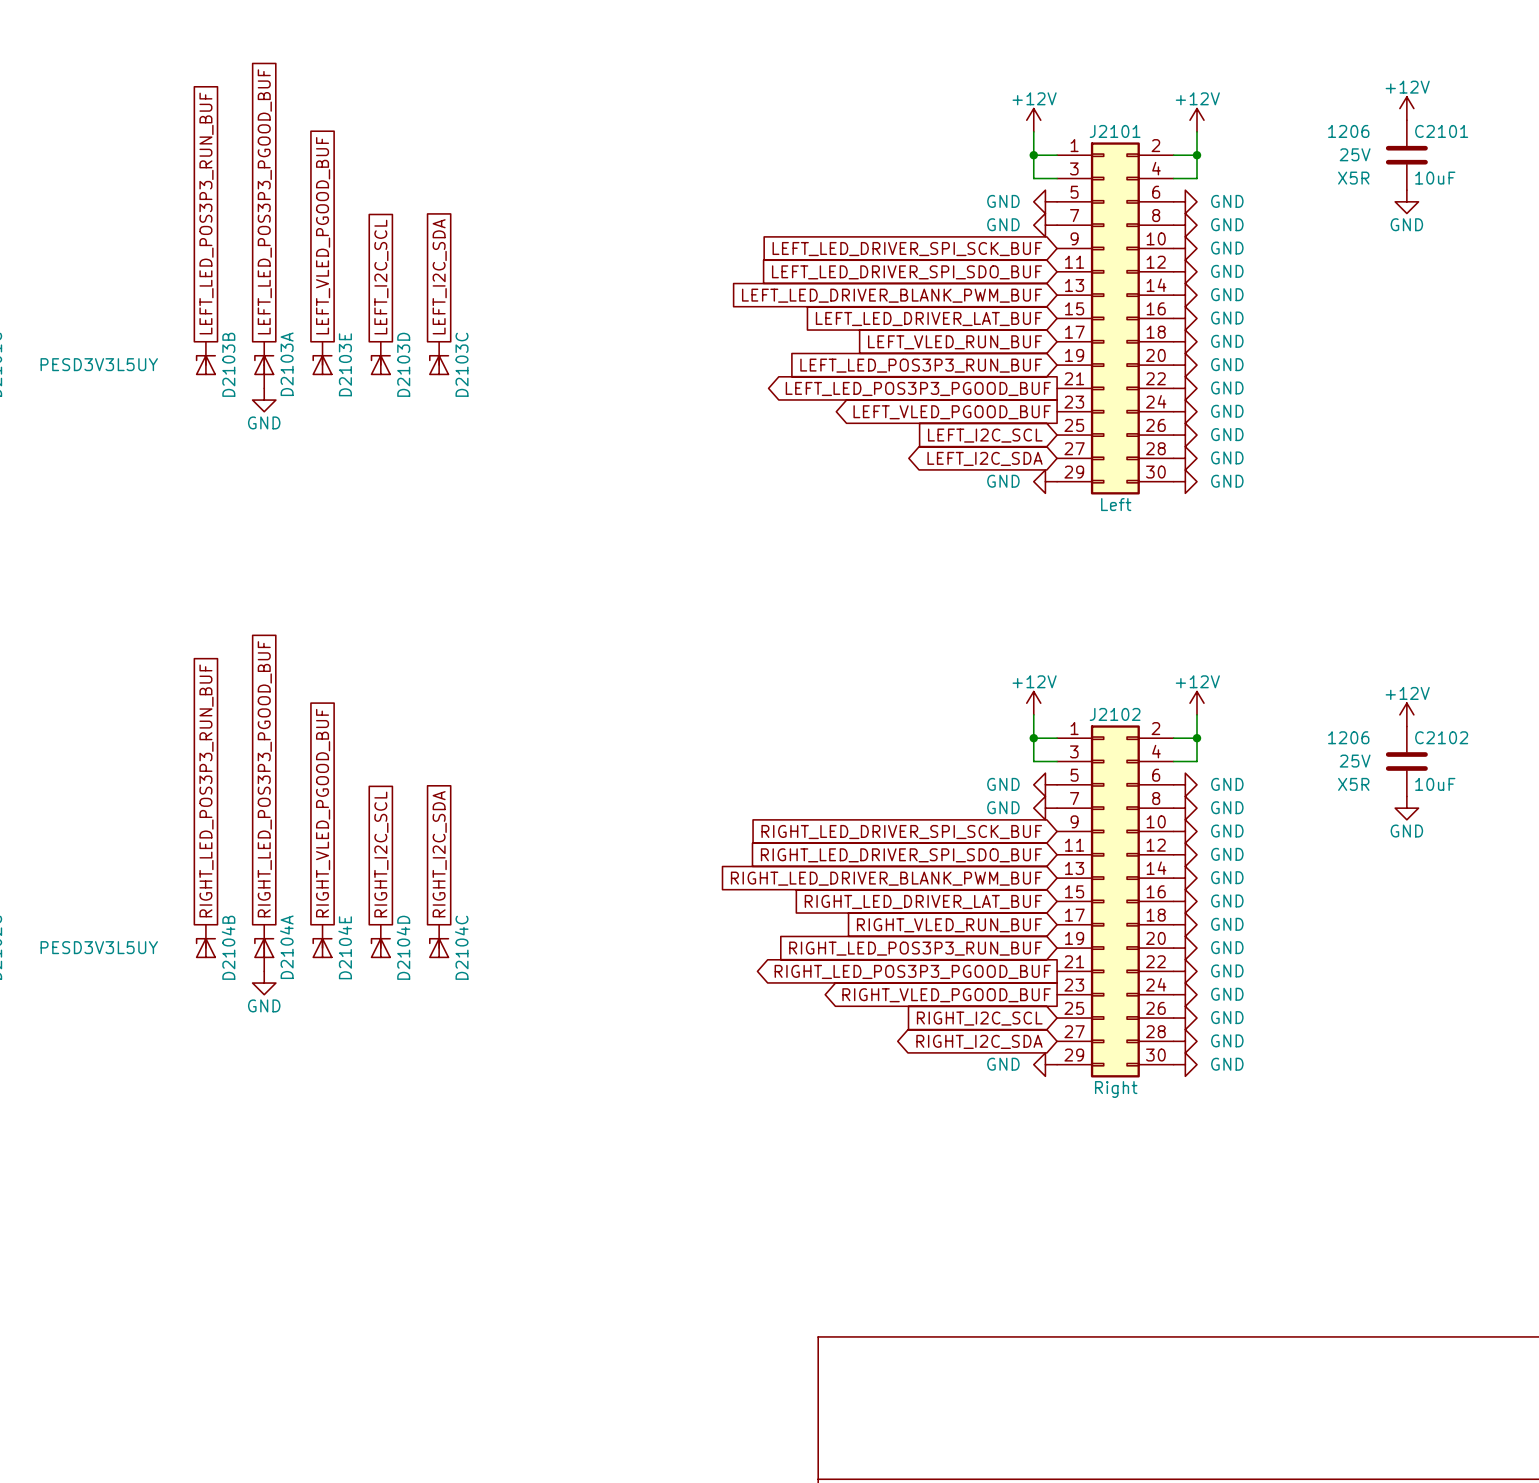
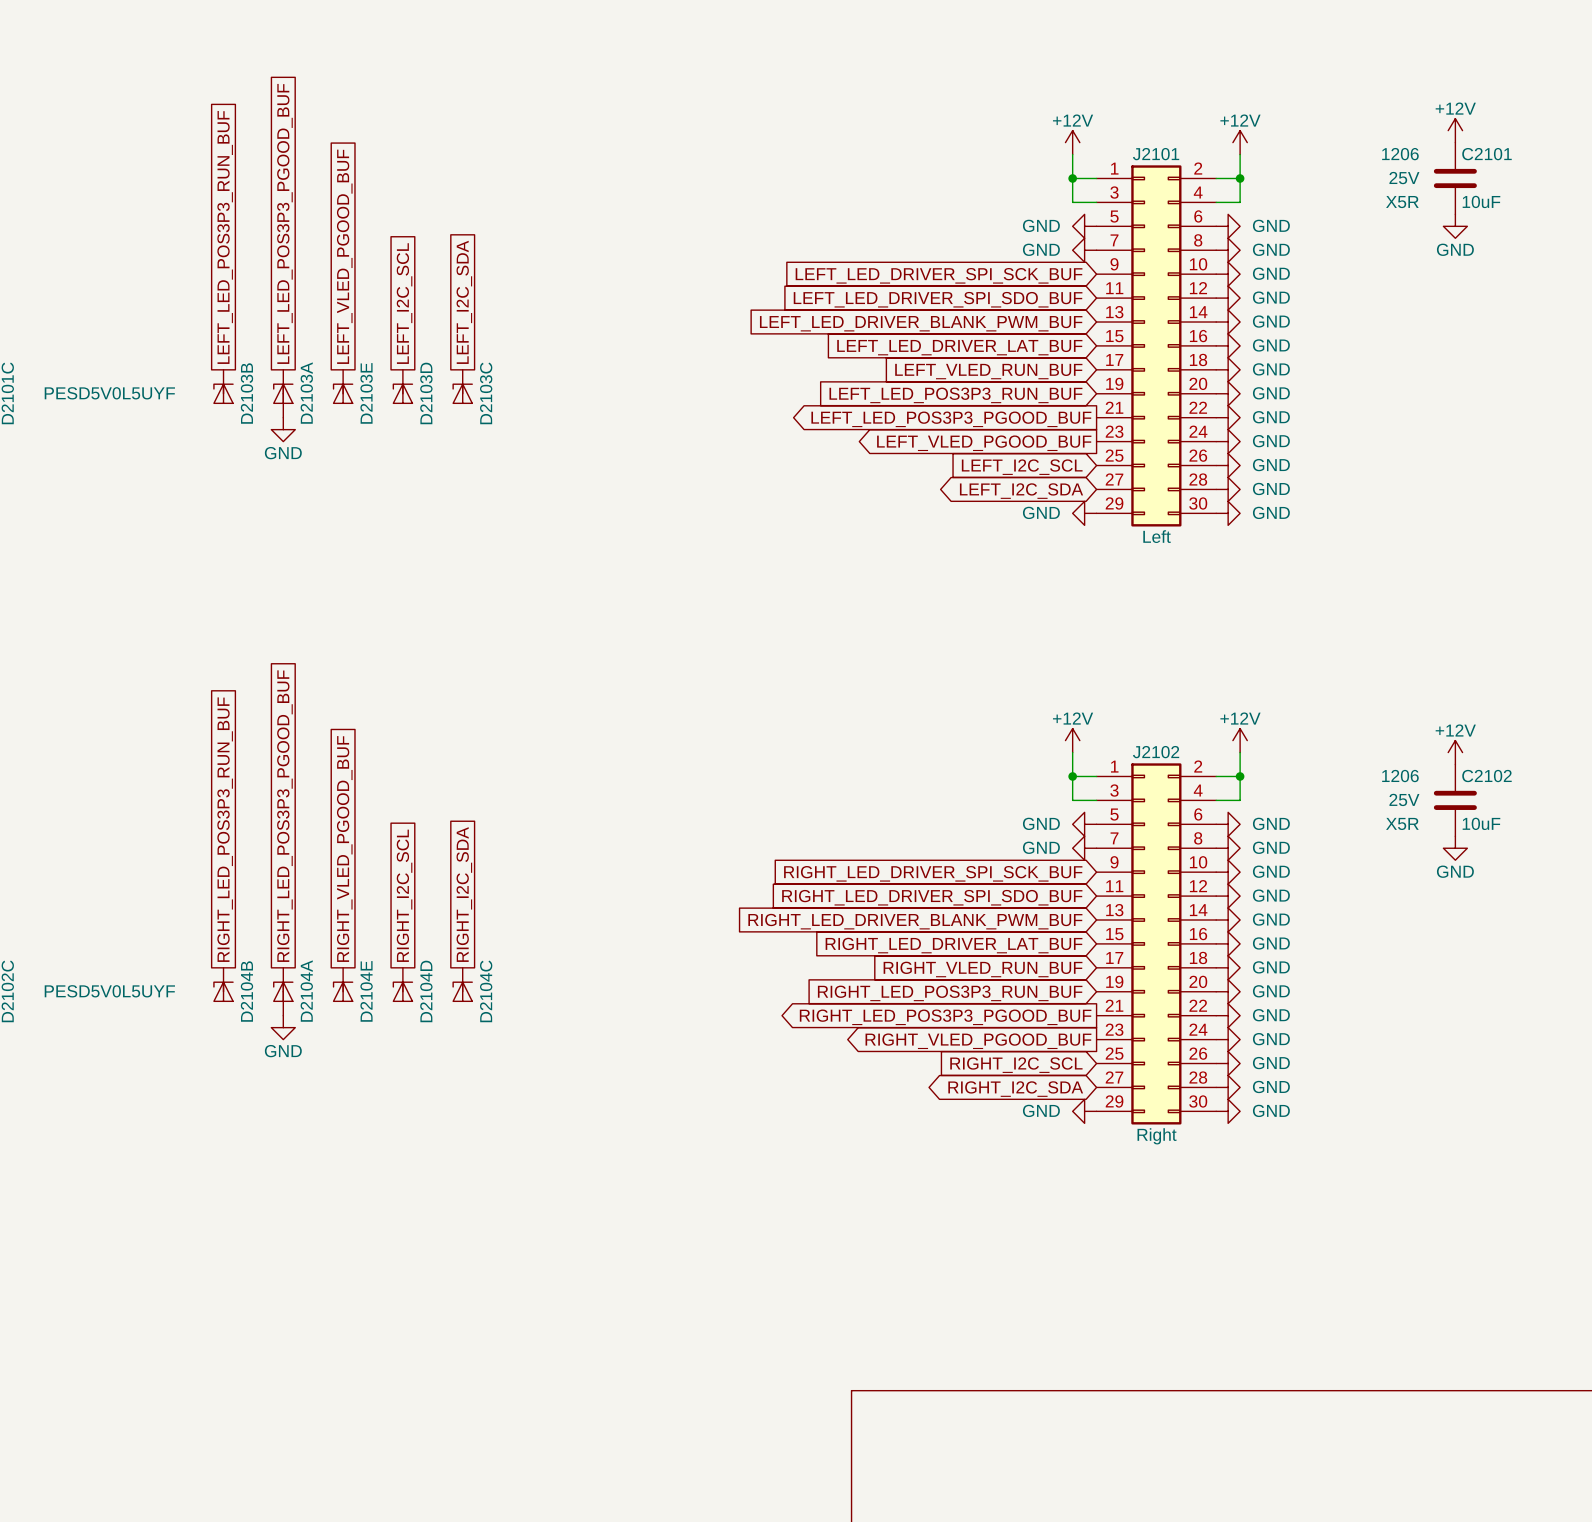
D2103A value: PESD3V3L5UY (99, 364) -> PESD5V0L5UYF (109, 393)
D2104A value: PESD3V3L5UY (99, 947) -> PESD5V0L5UYF (109, 991)

